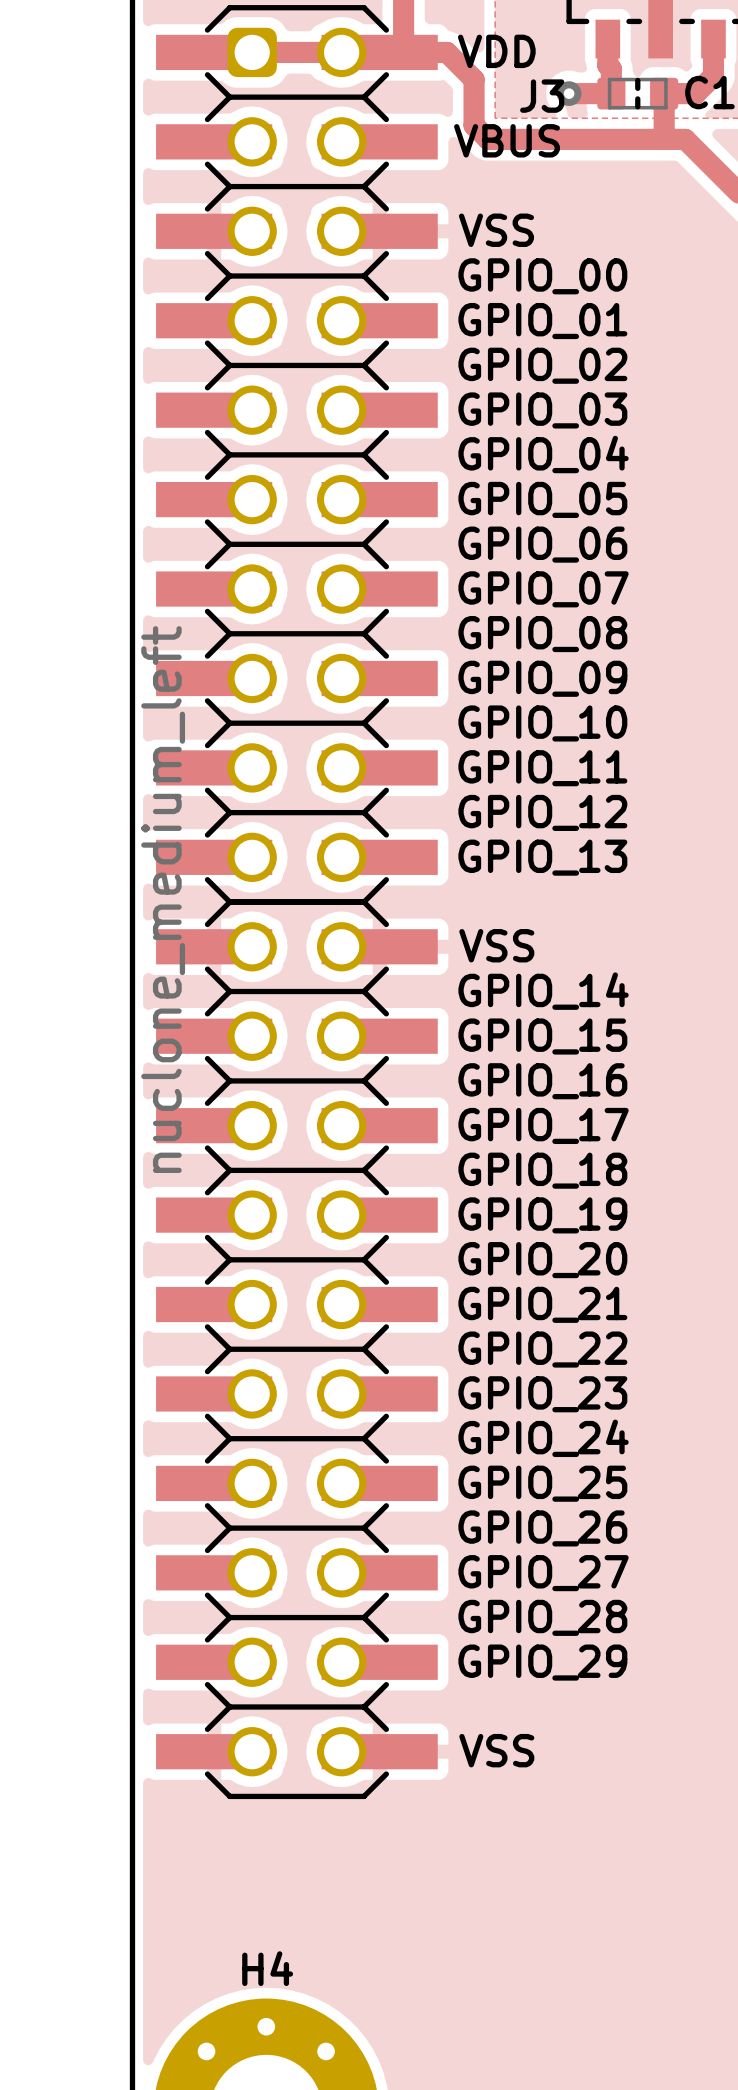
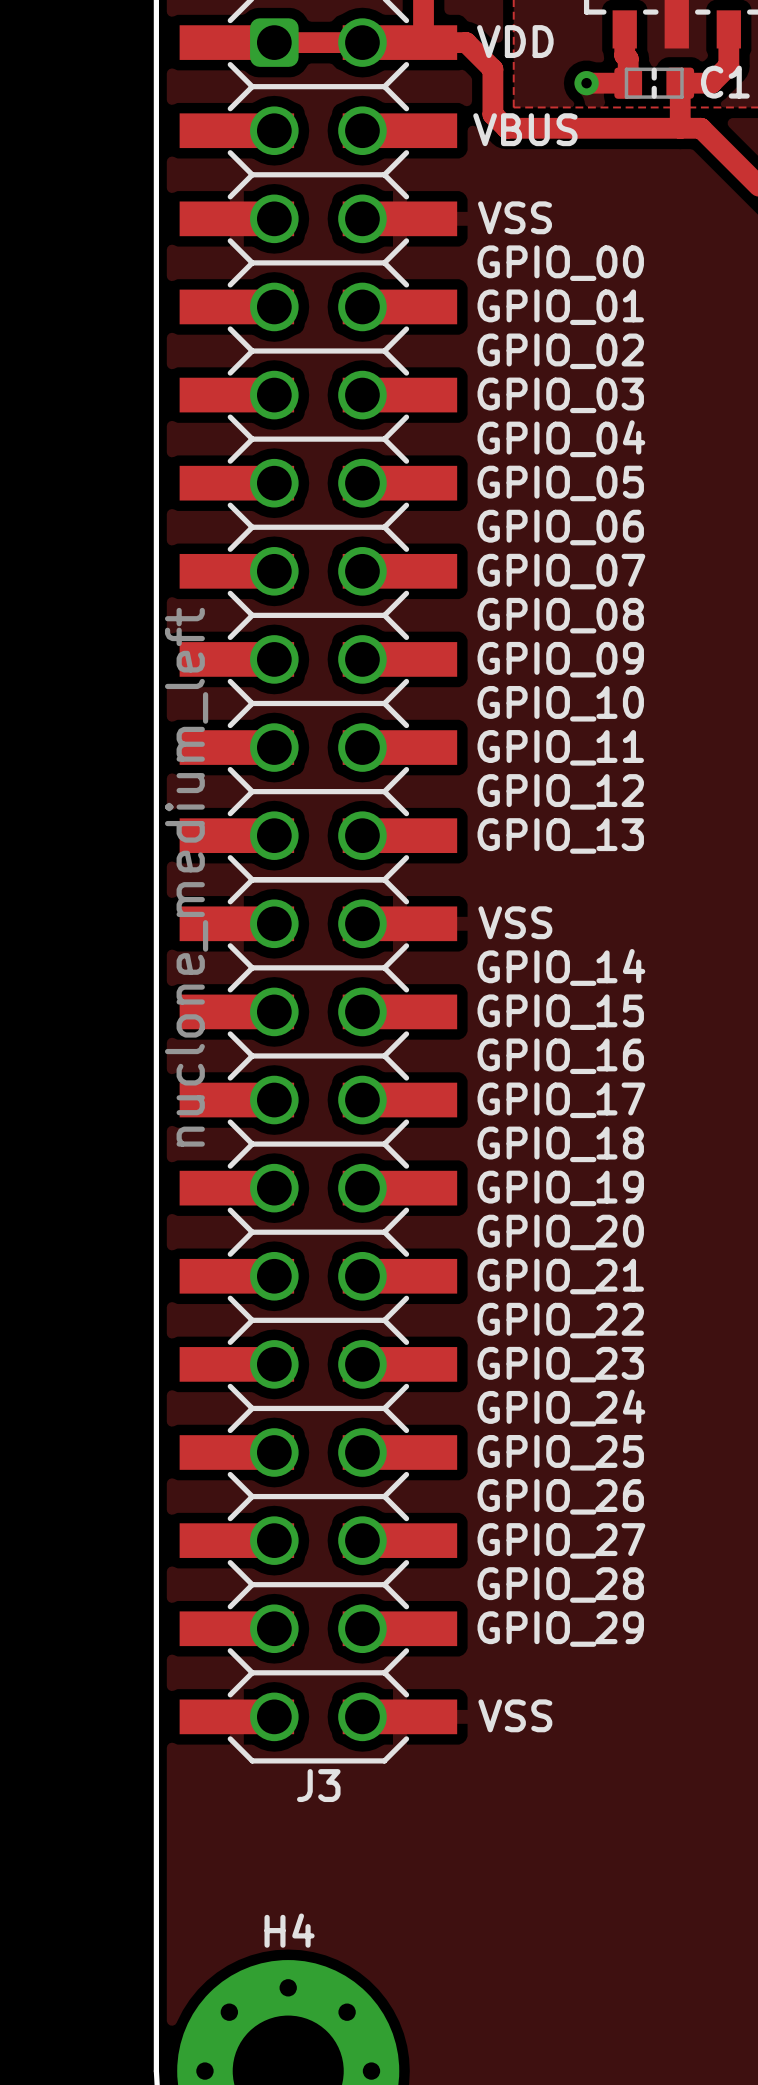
J3 name position: J3 (542, 96) -> J3 (318, 1785)

